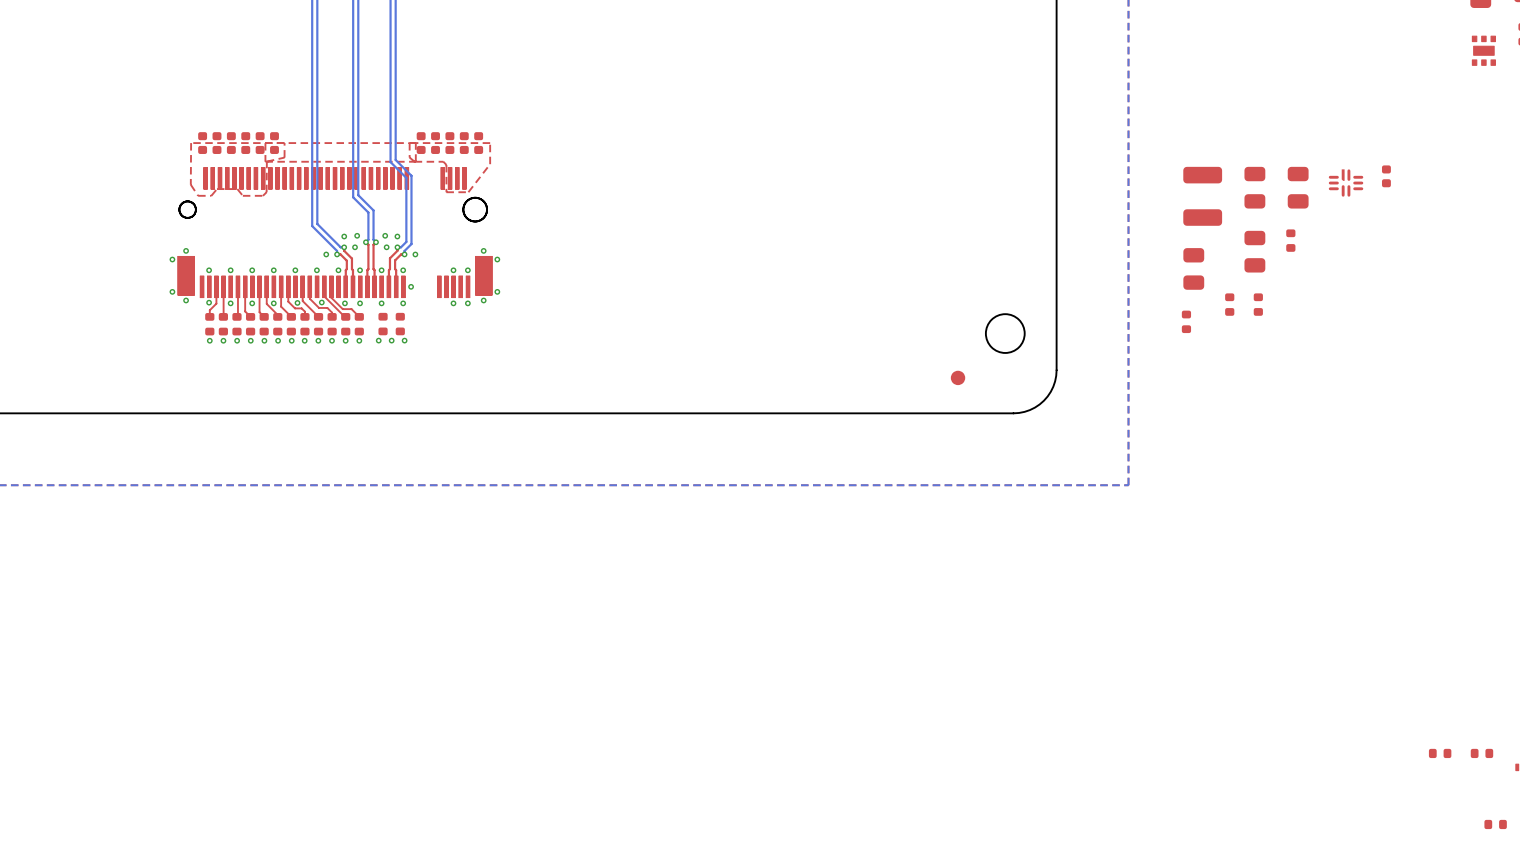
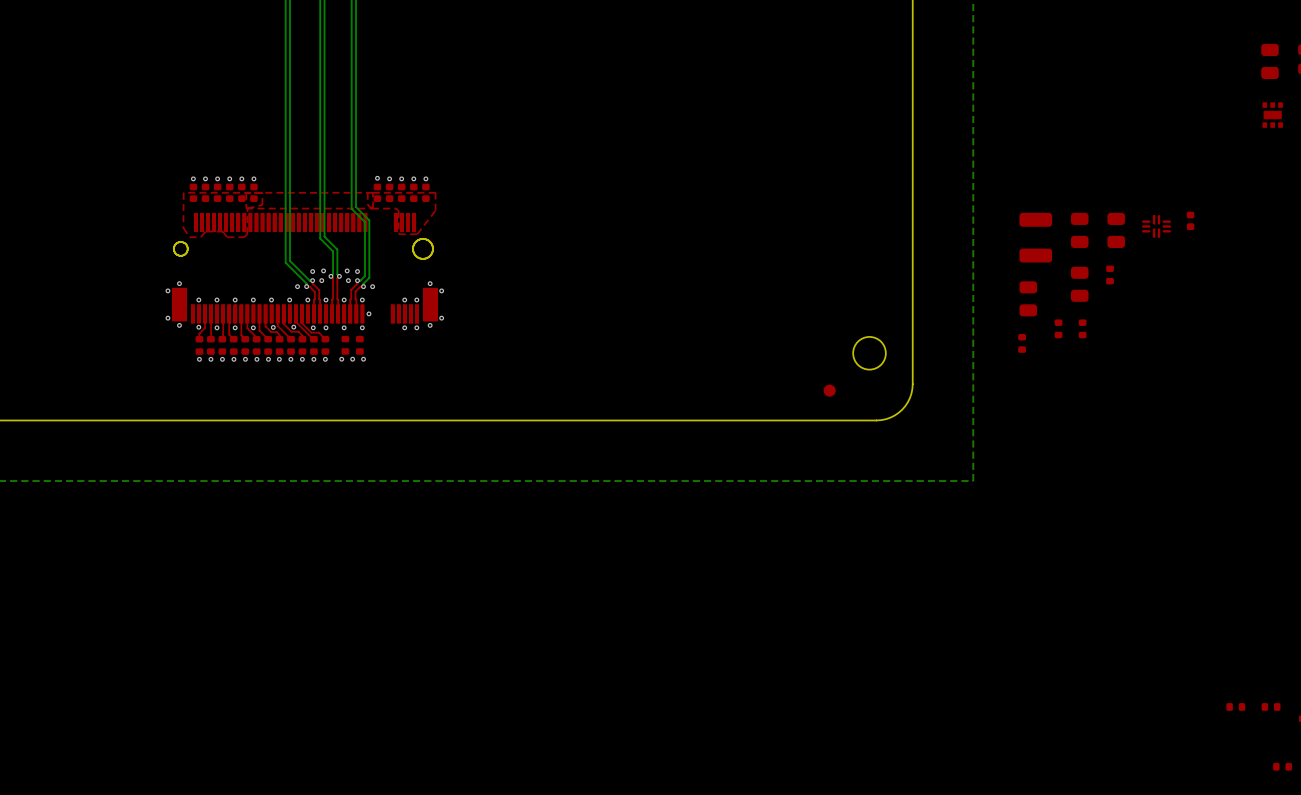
via: none -> (377, 178)
via: none -> (193, 178)
via: none -> (205, 178)
via: none -> (217, 178)
via: none -> (229, 178)
via: none -> (241, 178)
via: none -> (253, 178)
via: none -> (389, 178)
via: none -> (401, 178)
via: none -> (413, 178)
via: none -> (425, 178)

